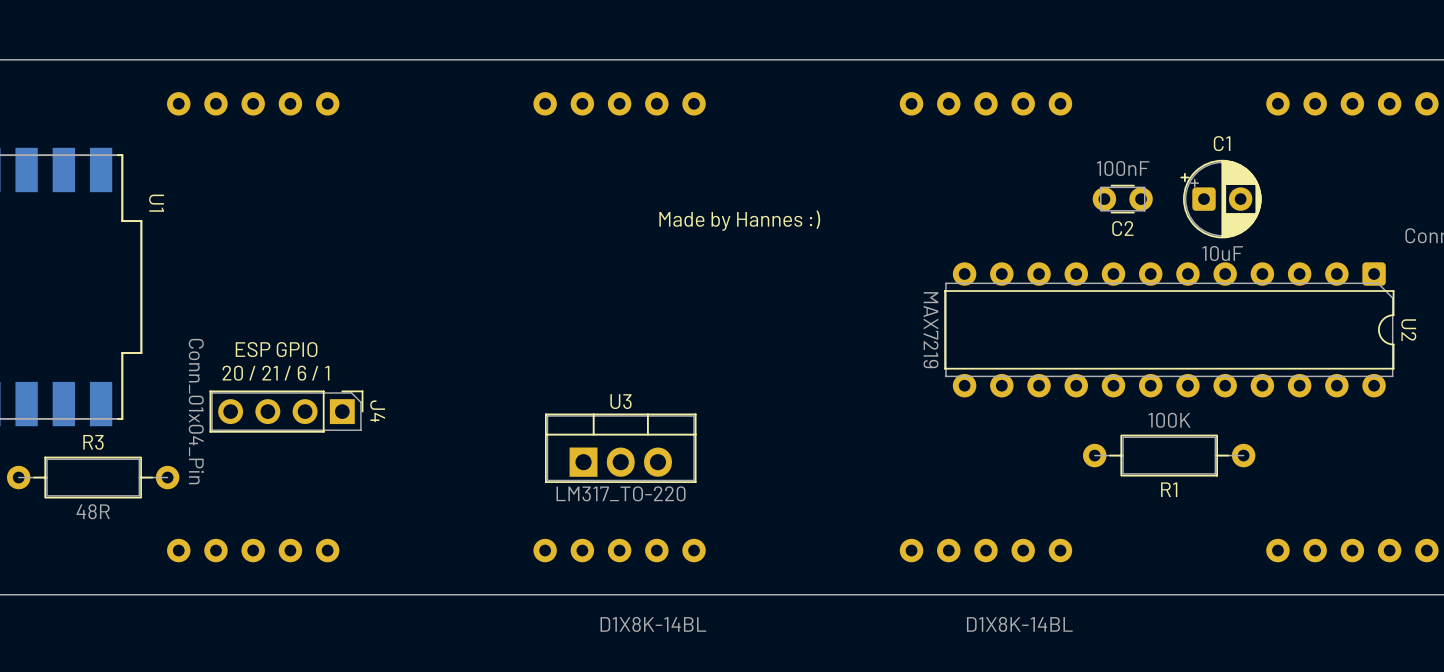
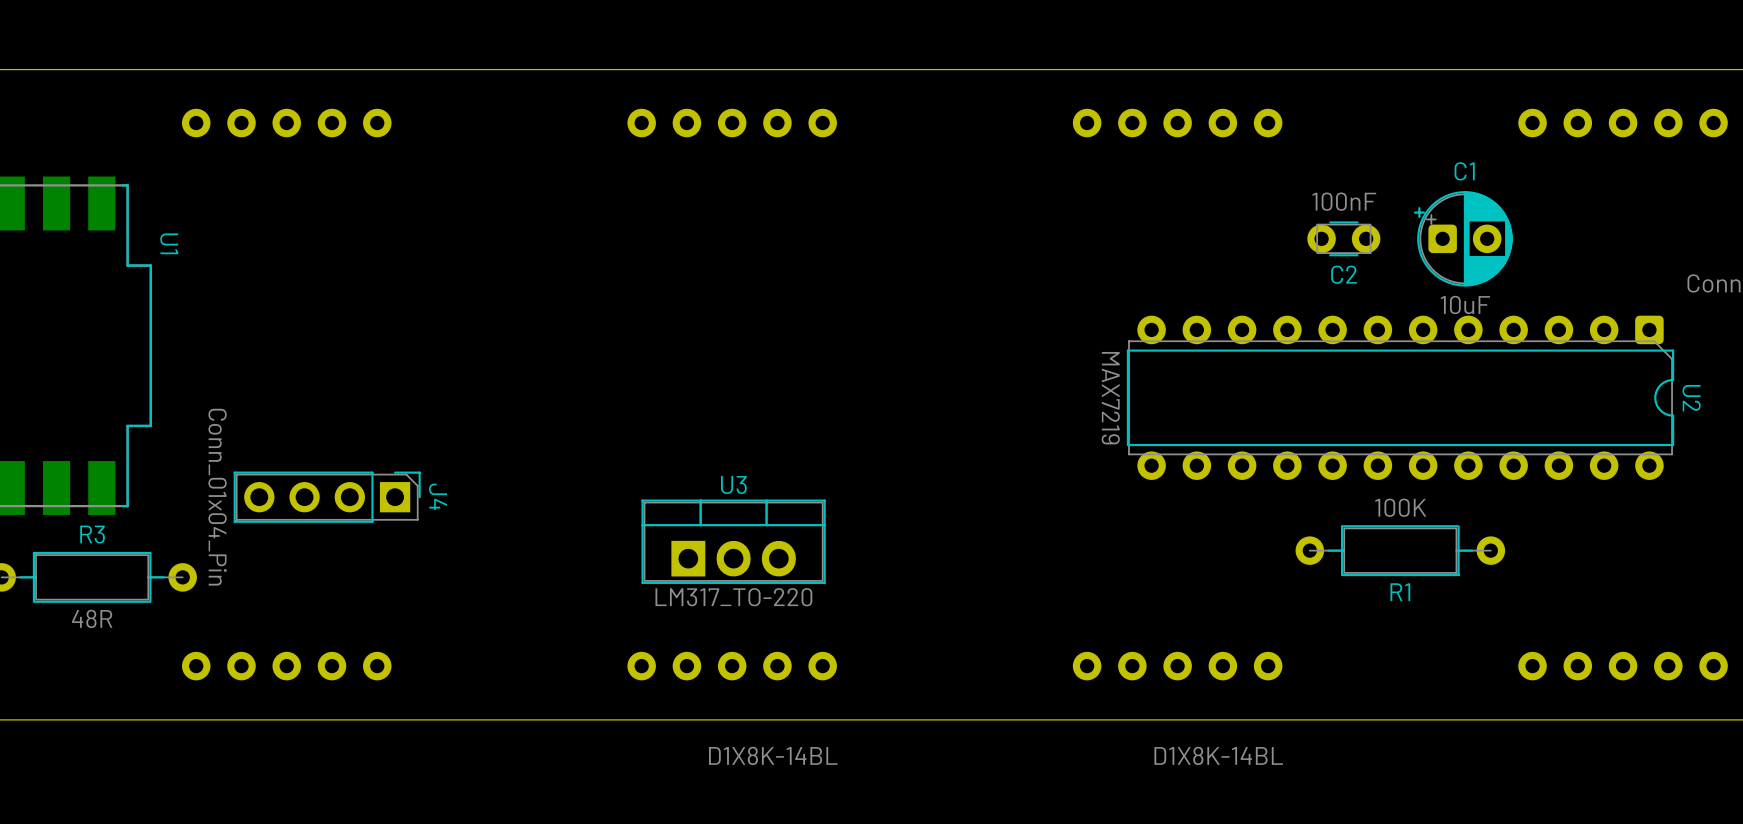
text: Made by Hannes :) (739, 220) -> none
text: ESP GPIO (276, 349) -> none
text: 20 / 21 / 6 / 1 (275, 373) -> none

